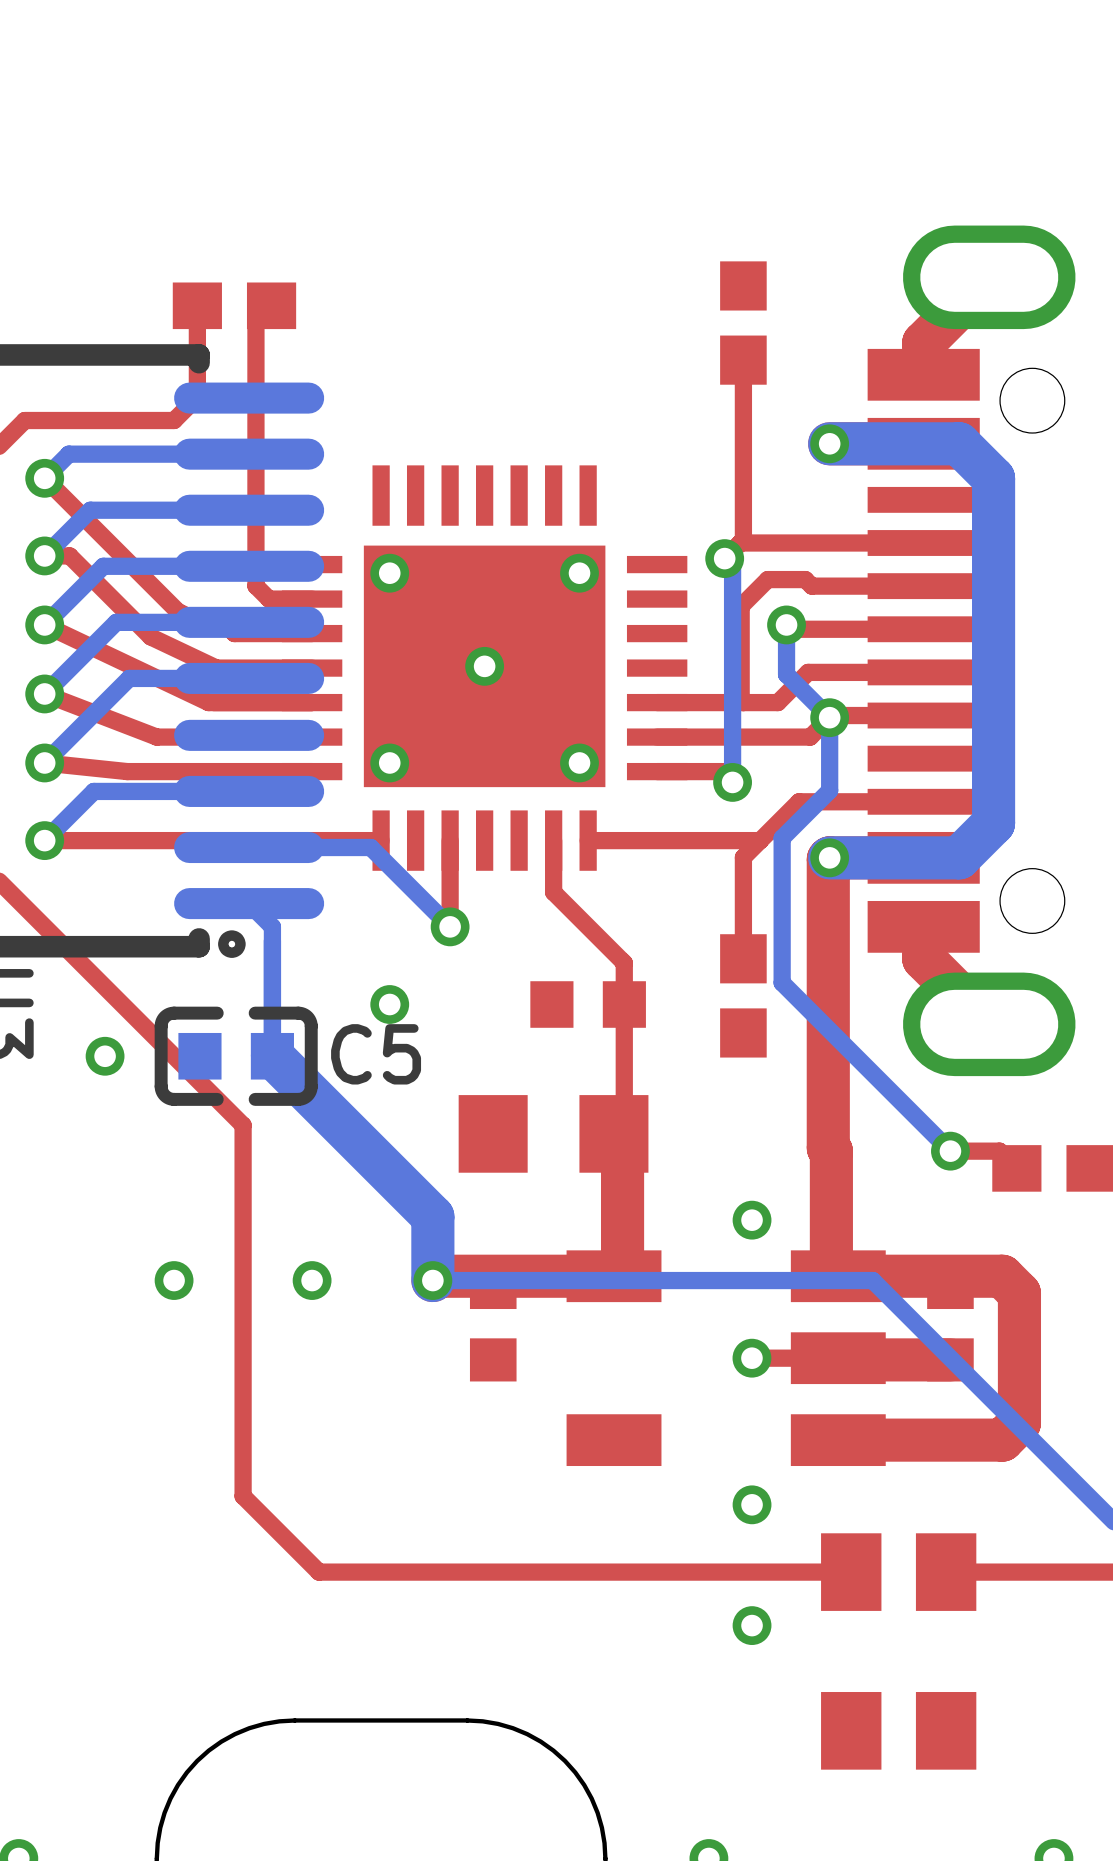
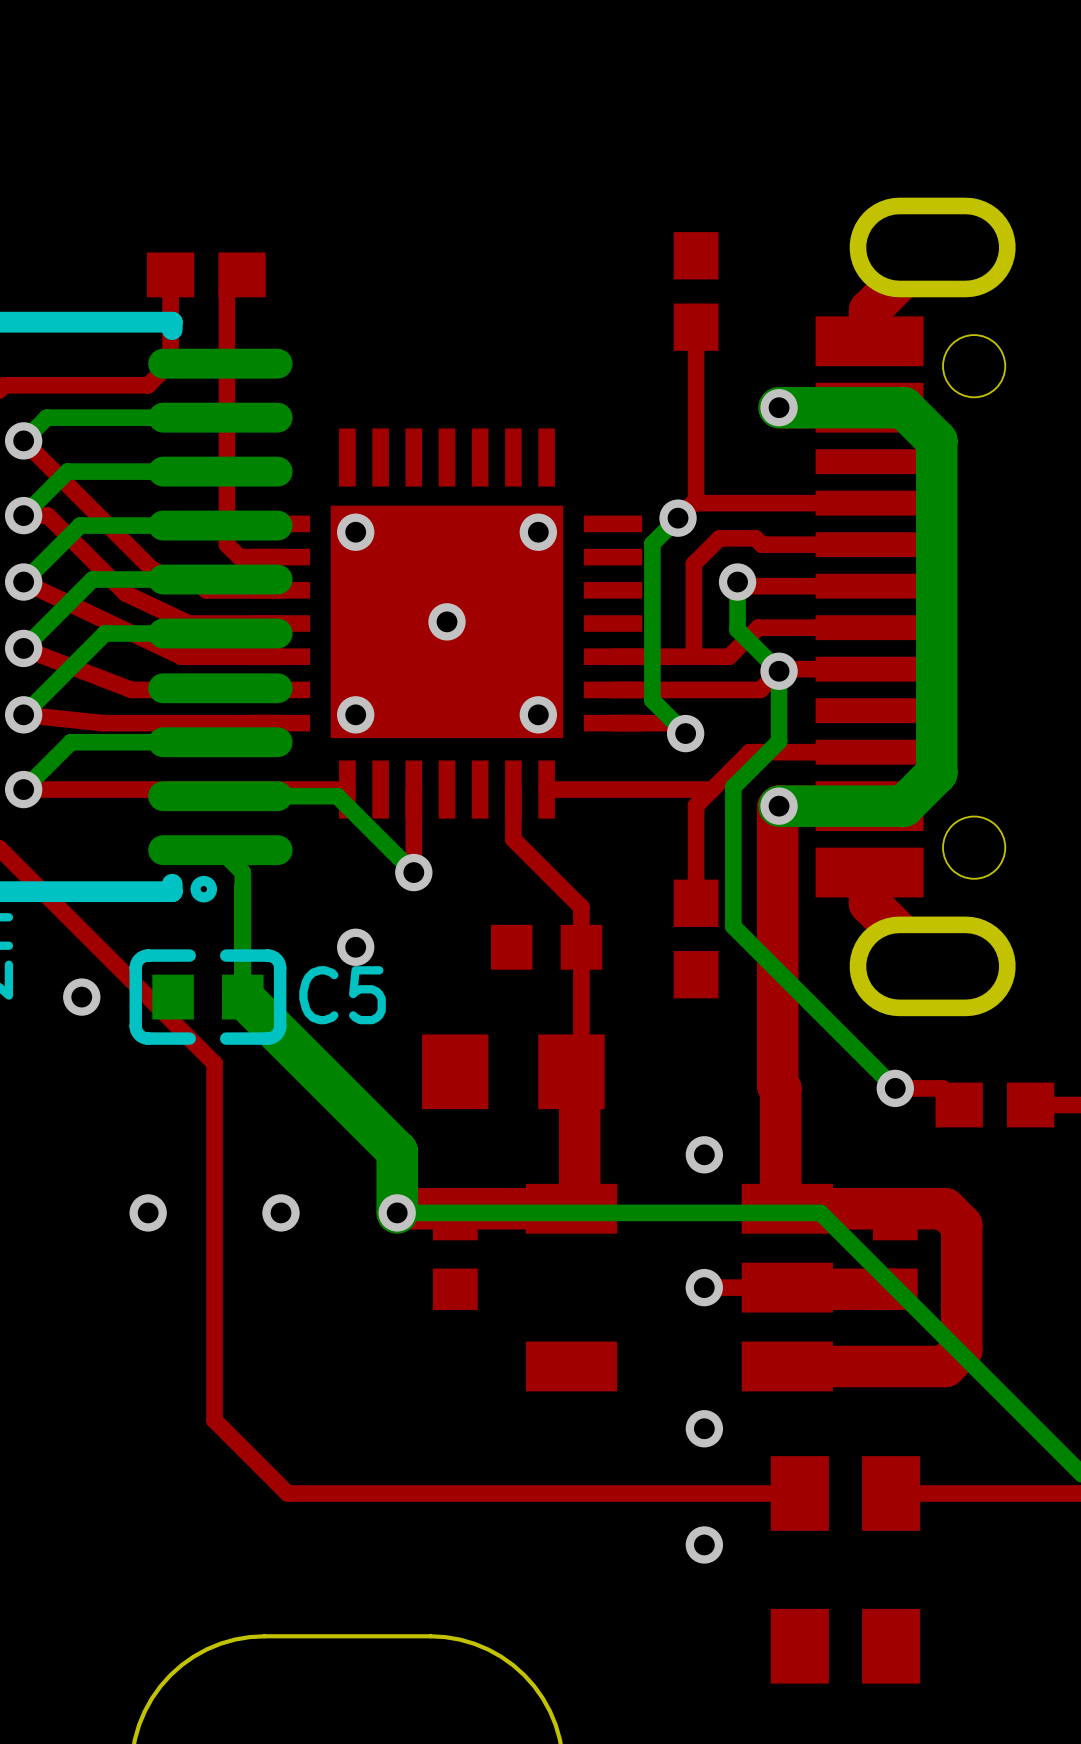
bottom track: (724, 558) (732, 566) (732, 782) -> (678, 518) (652, 543) (652, 700) (685, 733)

